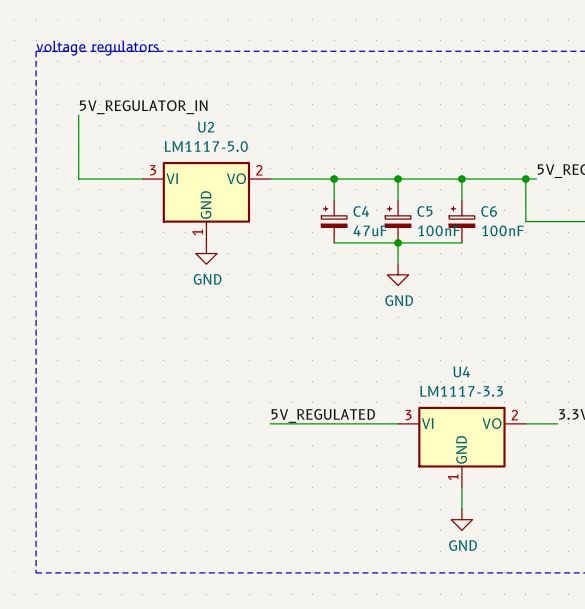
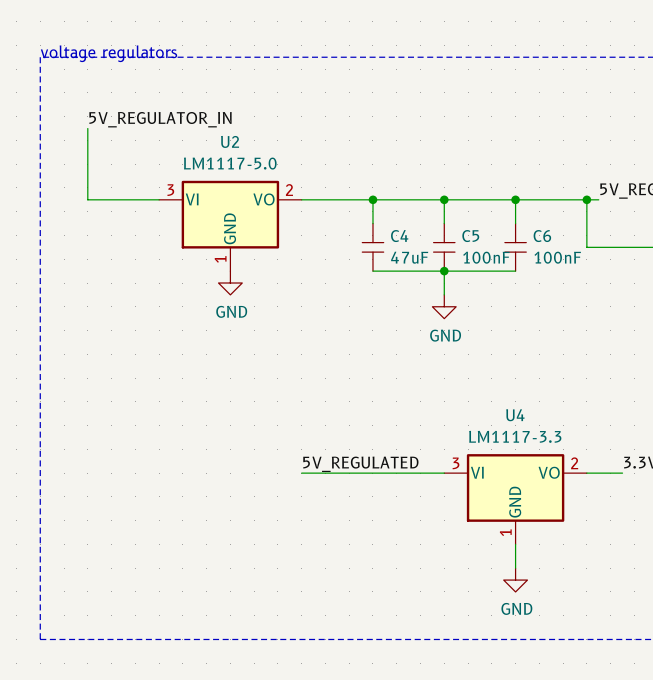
C4 symbol: [321, 200, 347, 243] -> [362, 223, 384, 272]
C5 symbol: [385, 200, 411, 243] -> [433, 223, 455, 272]
C6 symbol: [449, 200, 475, 243] -> [504, 223, 527, 272]

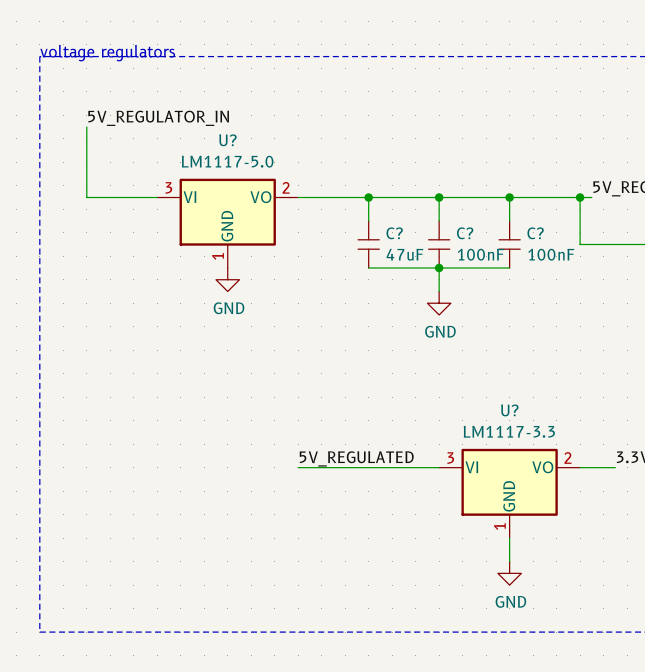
U2 name: U2 (230, 141) -> U? (227, 140)
C4 name: C4 (399, 236) -> C? (394, 233)
C5 name: C5 (470, 236) -> C? (465, 233)
C6 name: C6 (542, 236) -> C? (535, 233)
U4 name: U4 (515, 415) -> U? (509, 410)

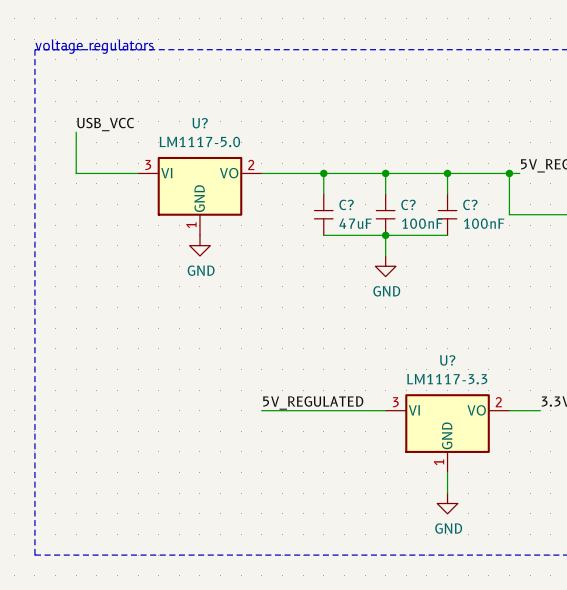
label: 5V_REGULATOR_IN (158, 118) -> none
wire: (86, 127) (86, 150) -> none
label: none -> USB_VCC (105, 124)

